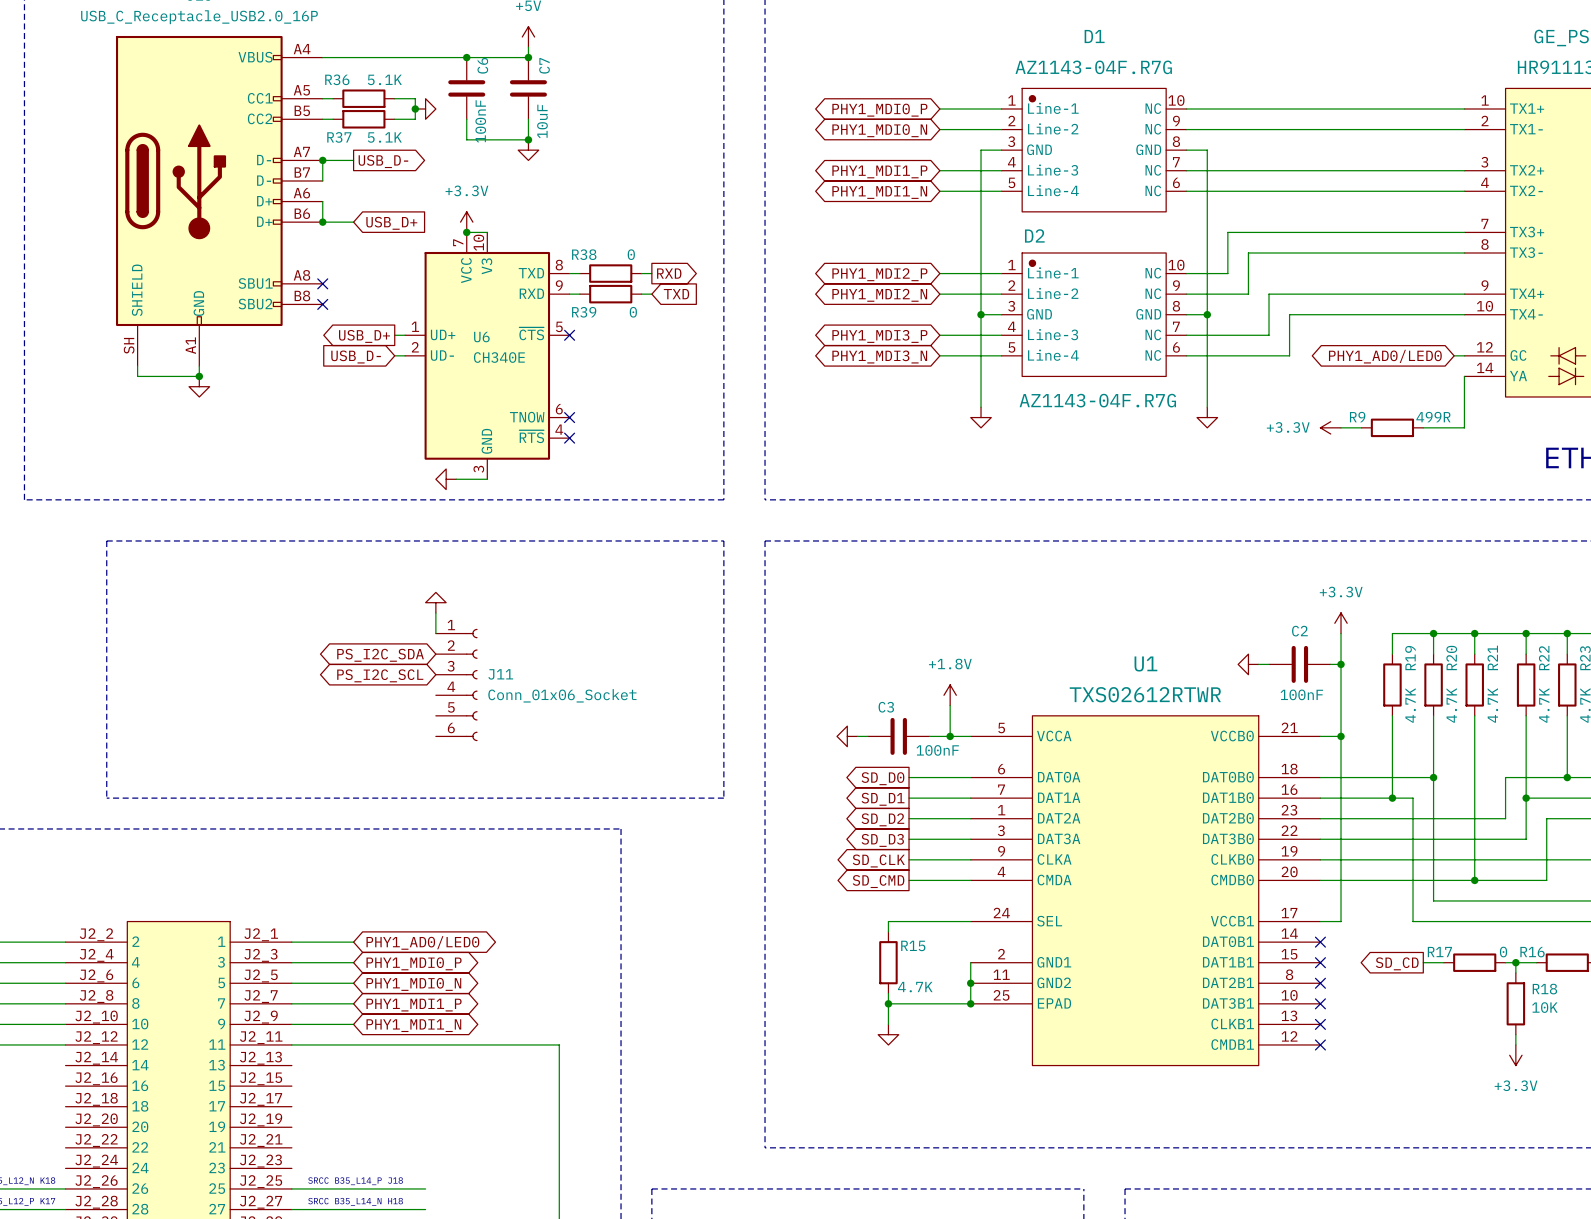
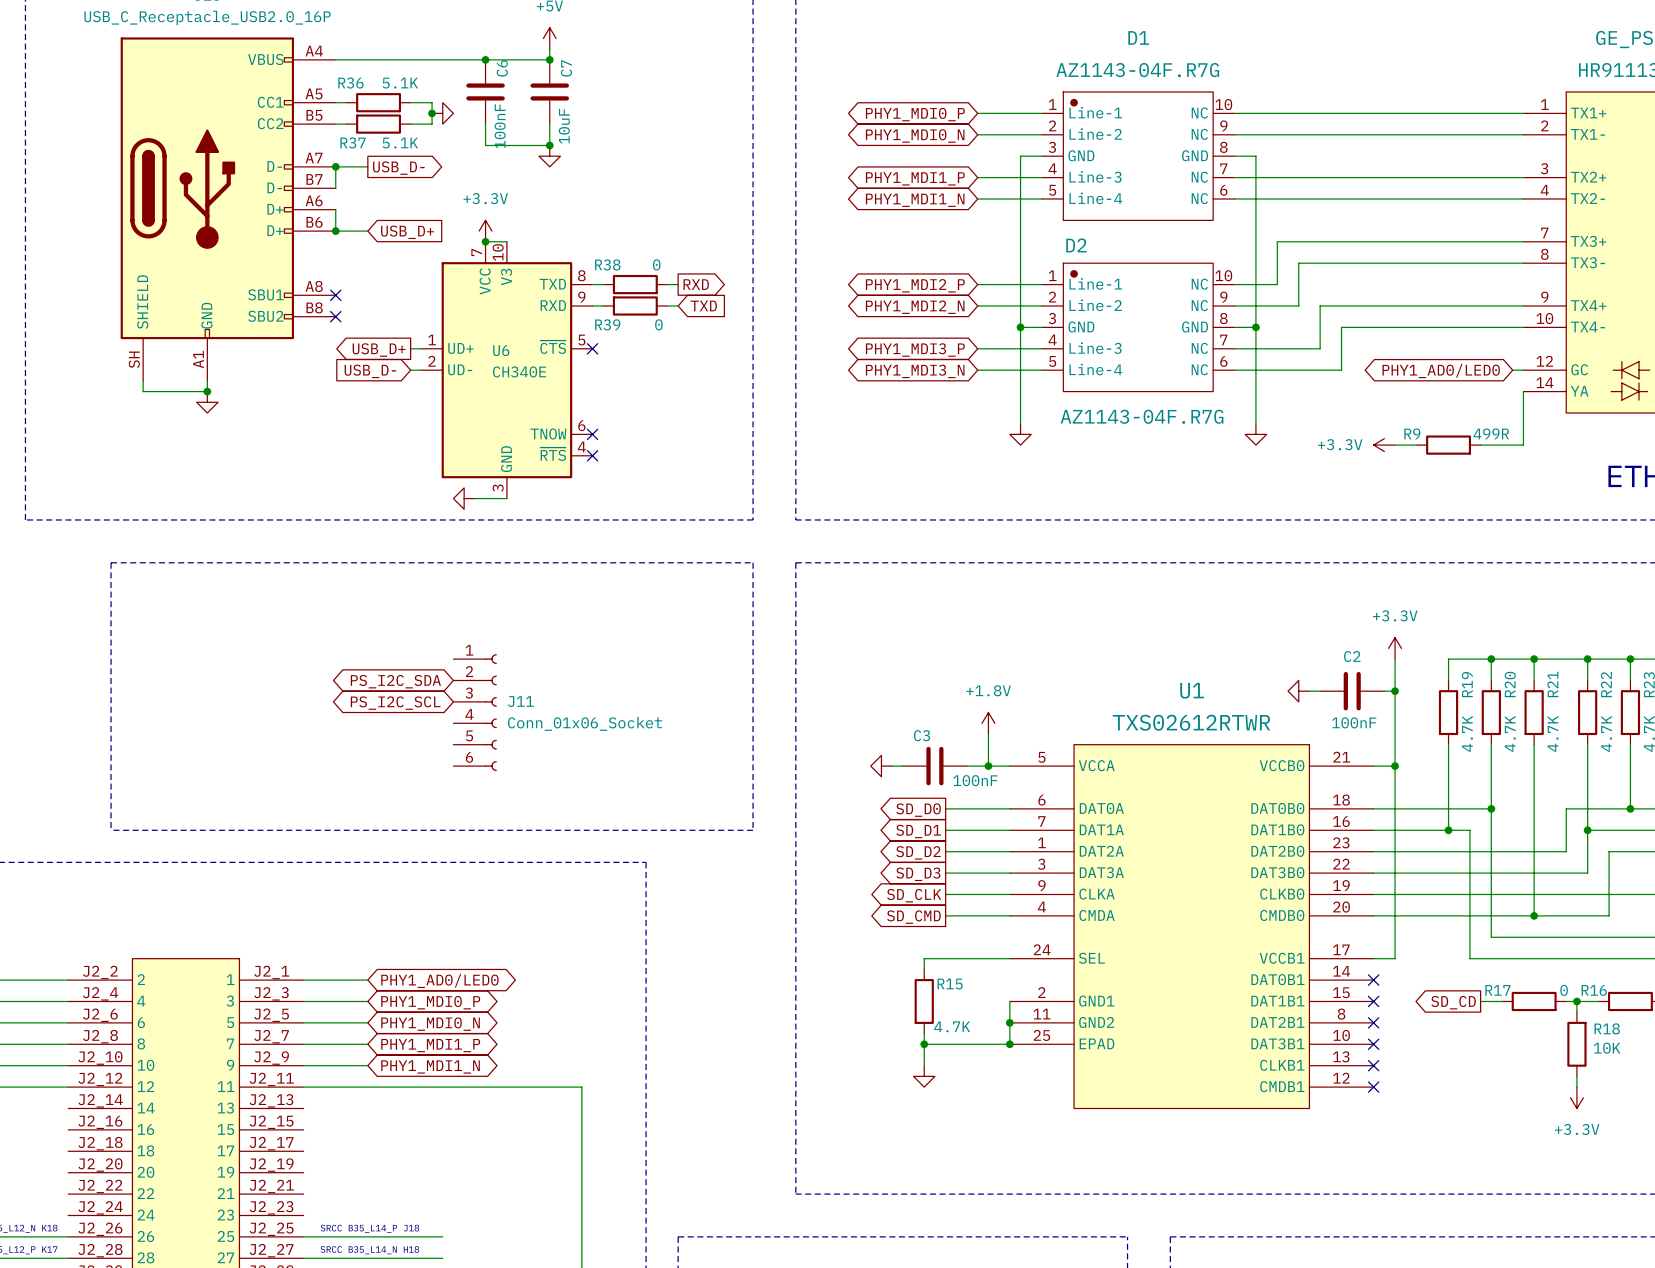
power symbol: (435, 602) -> none
wire: (435, 612) (435, 633) -> none

